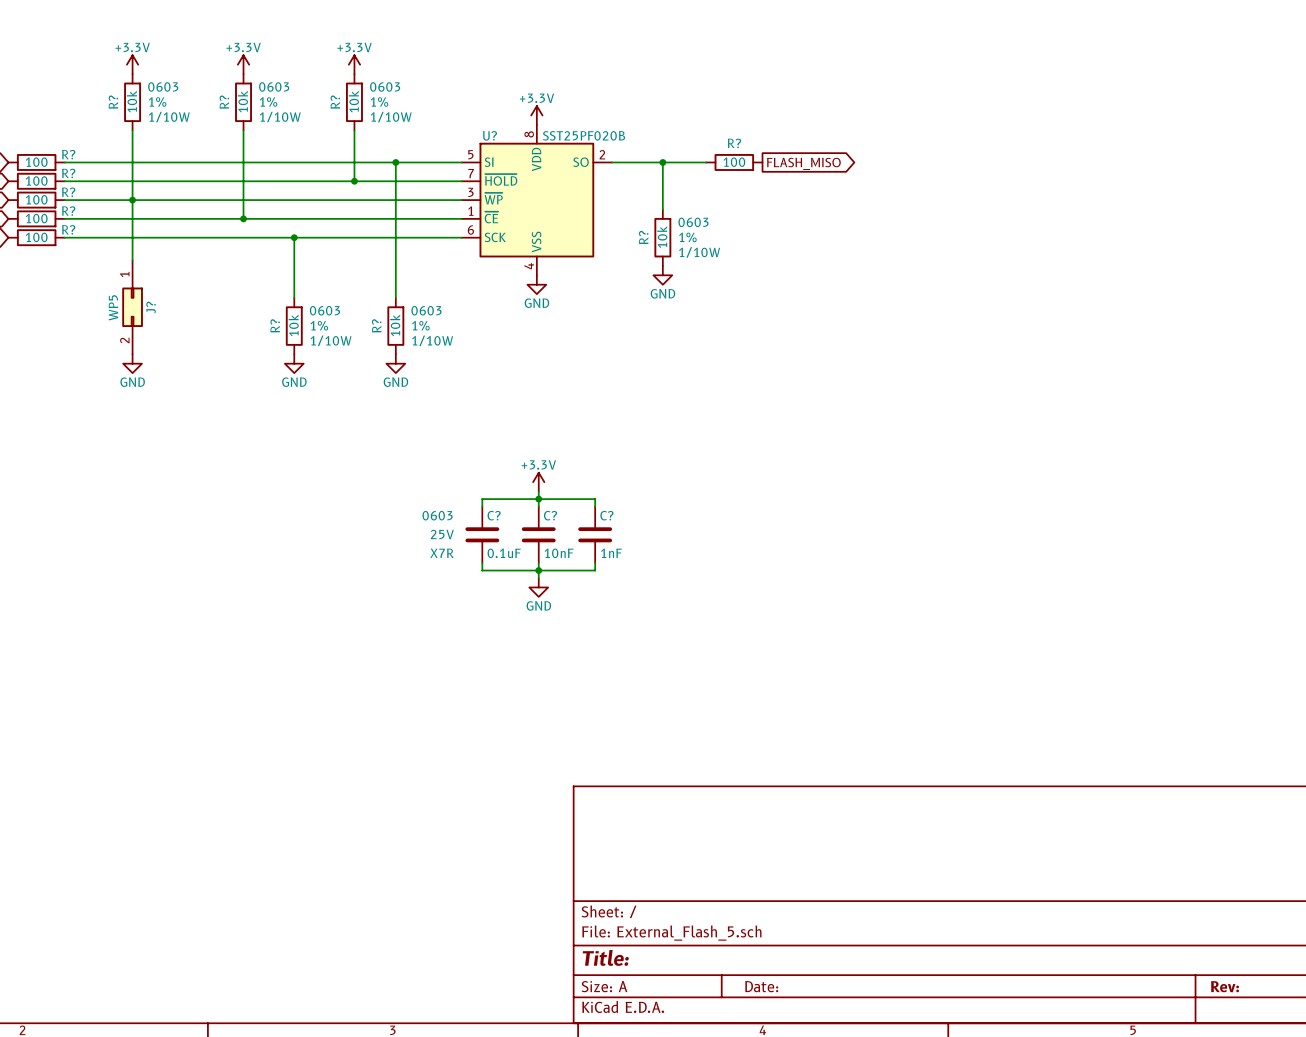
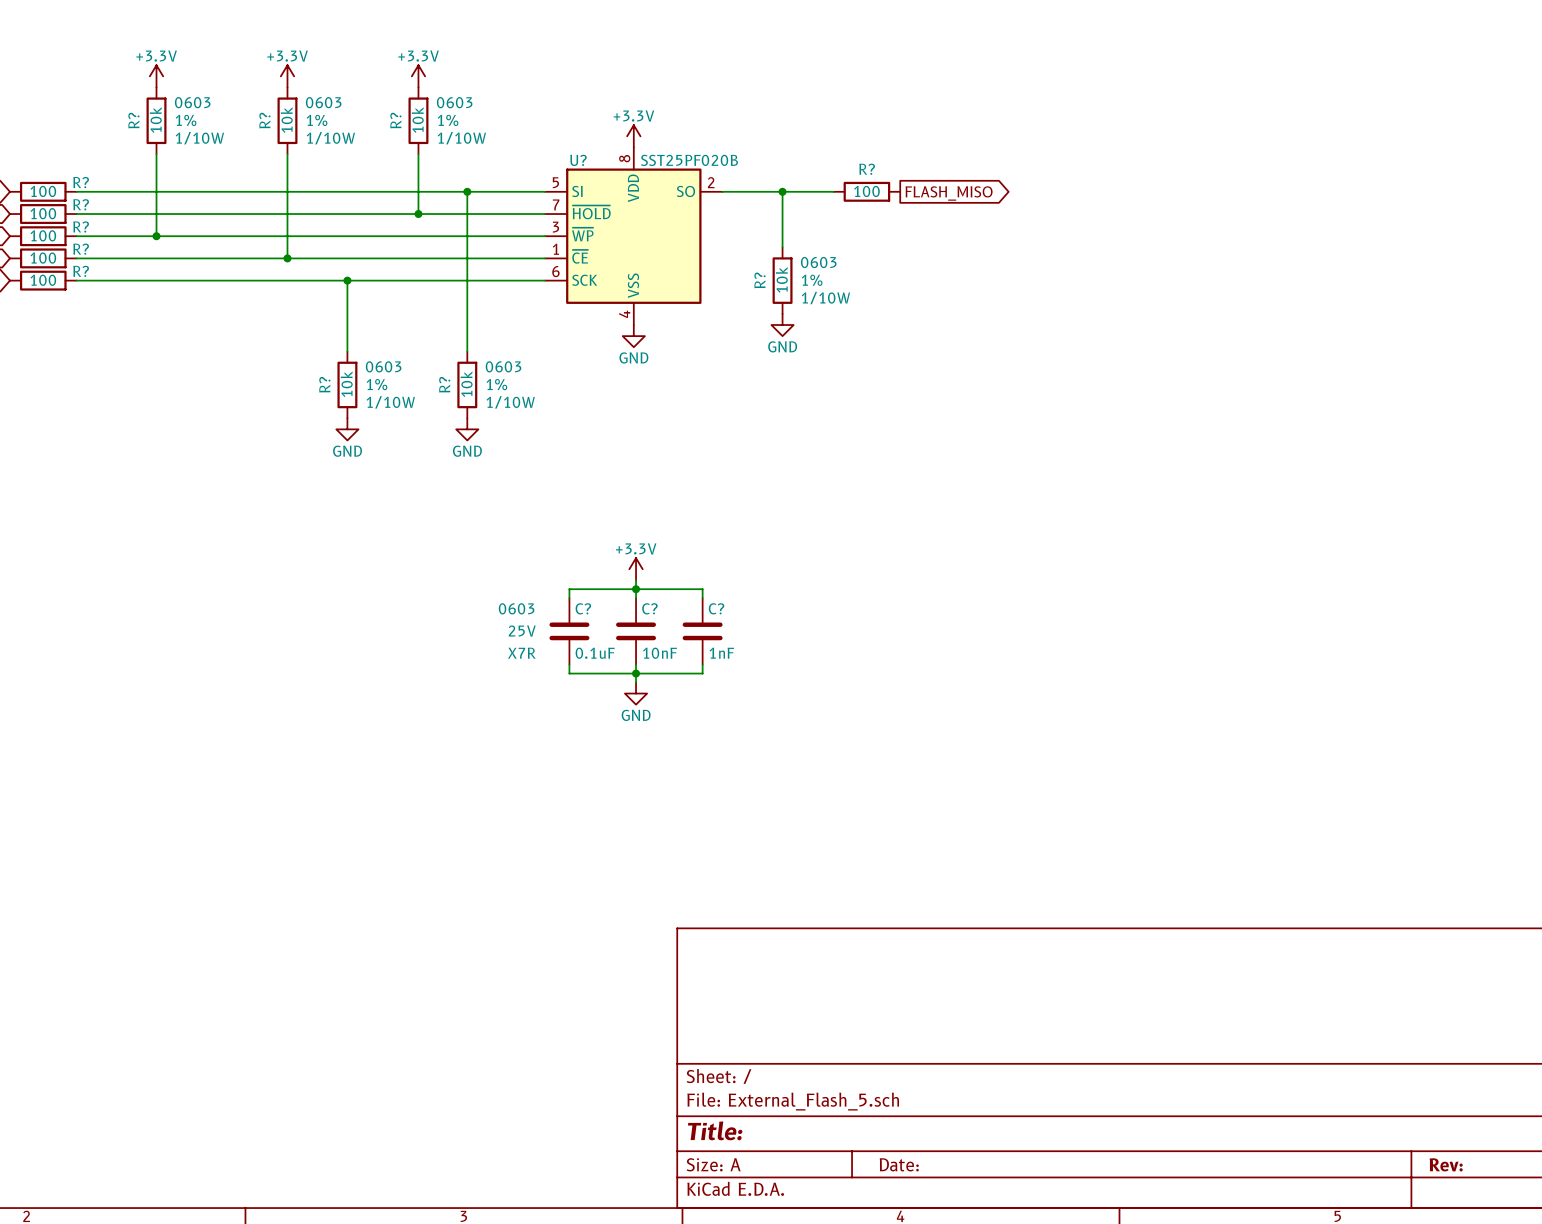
wire: (132, 200) (132, 260) -> none
J?: WP5 (132, 307) -> none
power symbol: GND (132, 363) -> none

